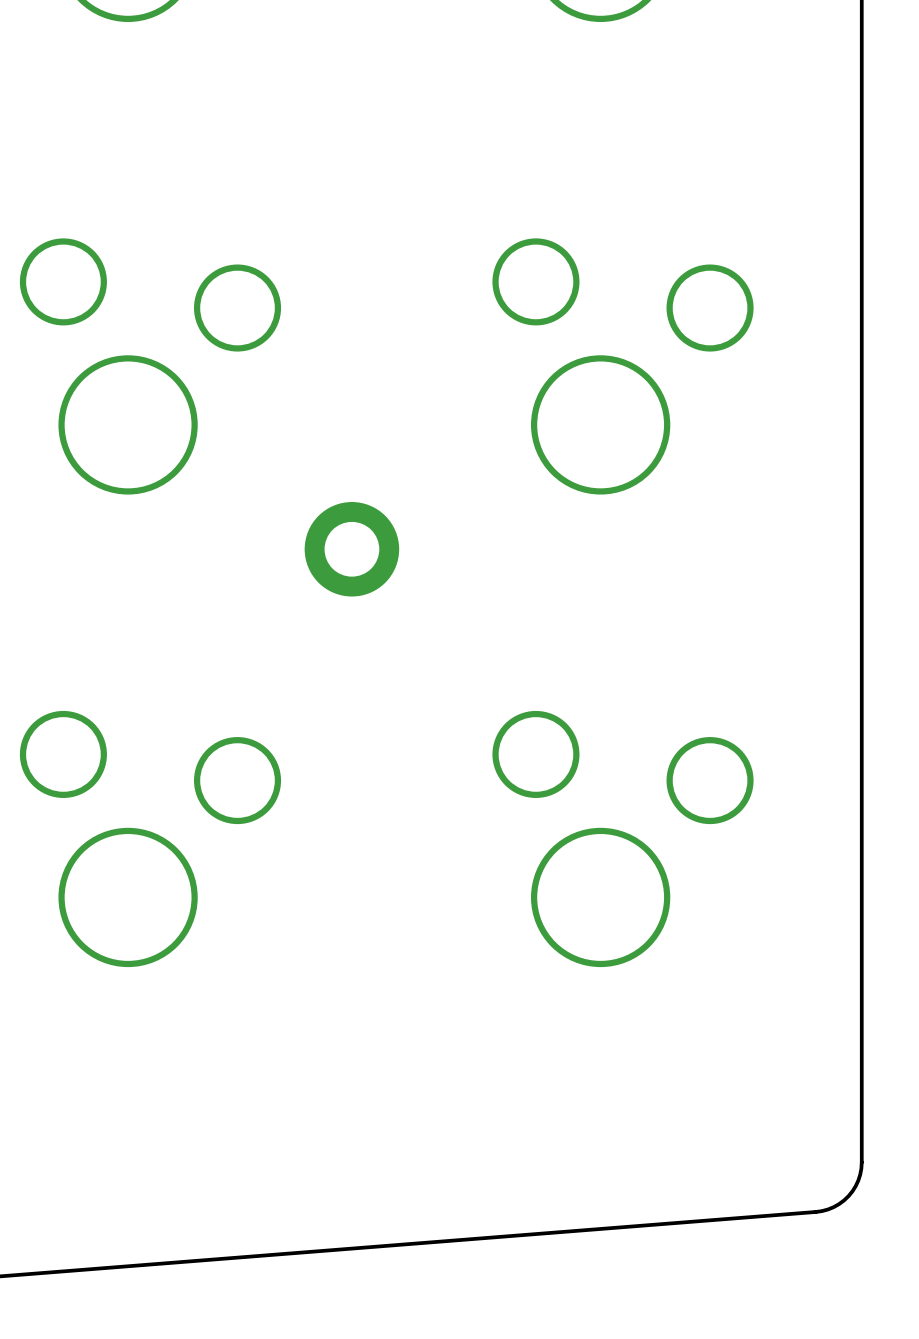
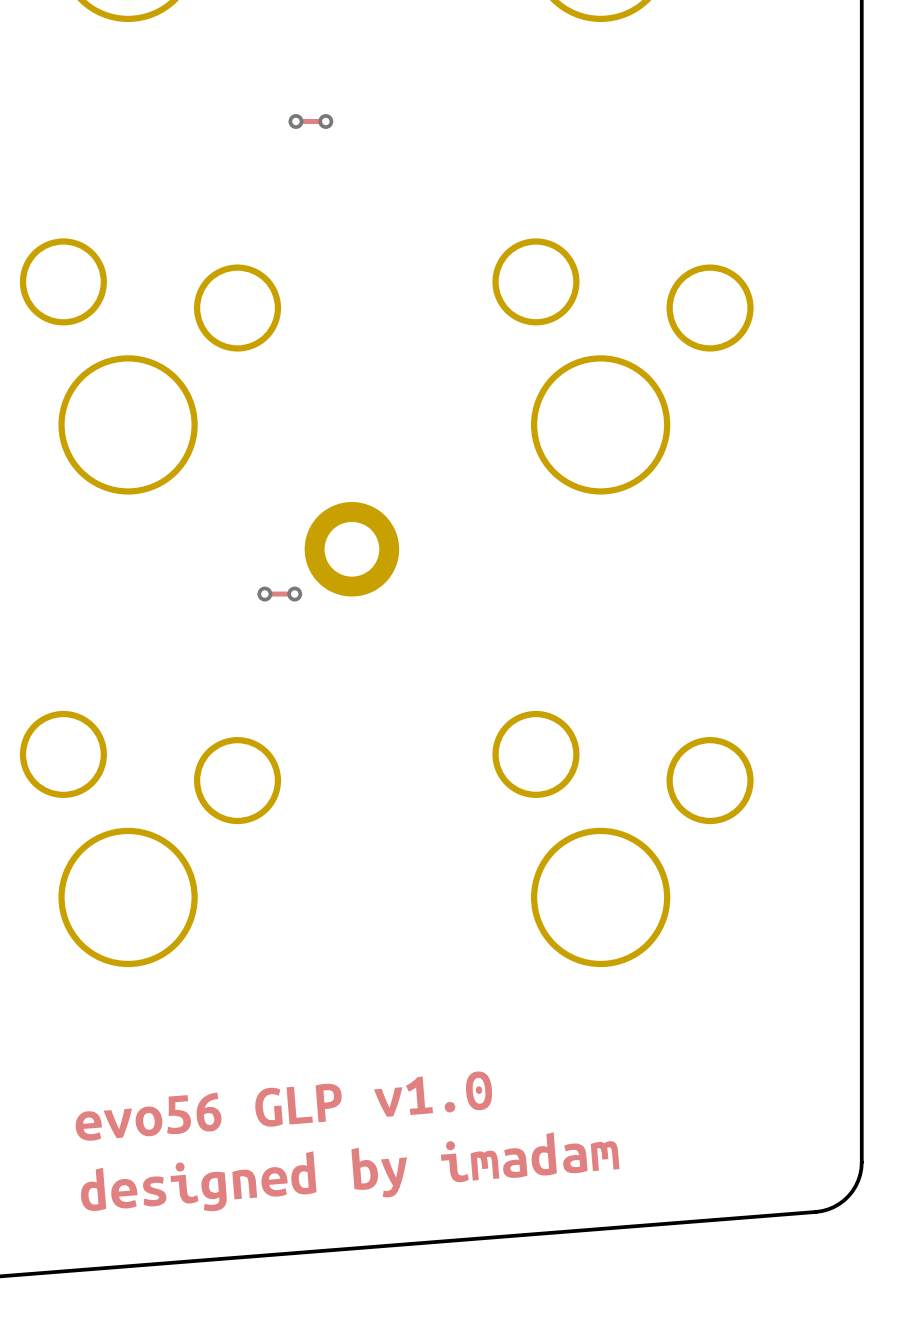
track: none -> (295, 121) (325, 121)
via: none -> (295, 121)
via: none -> (325, 121)
track: none -> (264, 594) (294, 594)
via: none -> (264, 594)
via: none -> (294, 594)
drawing: none -> [75, 1071, 620, 1212]

